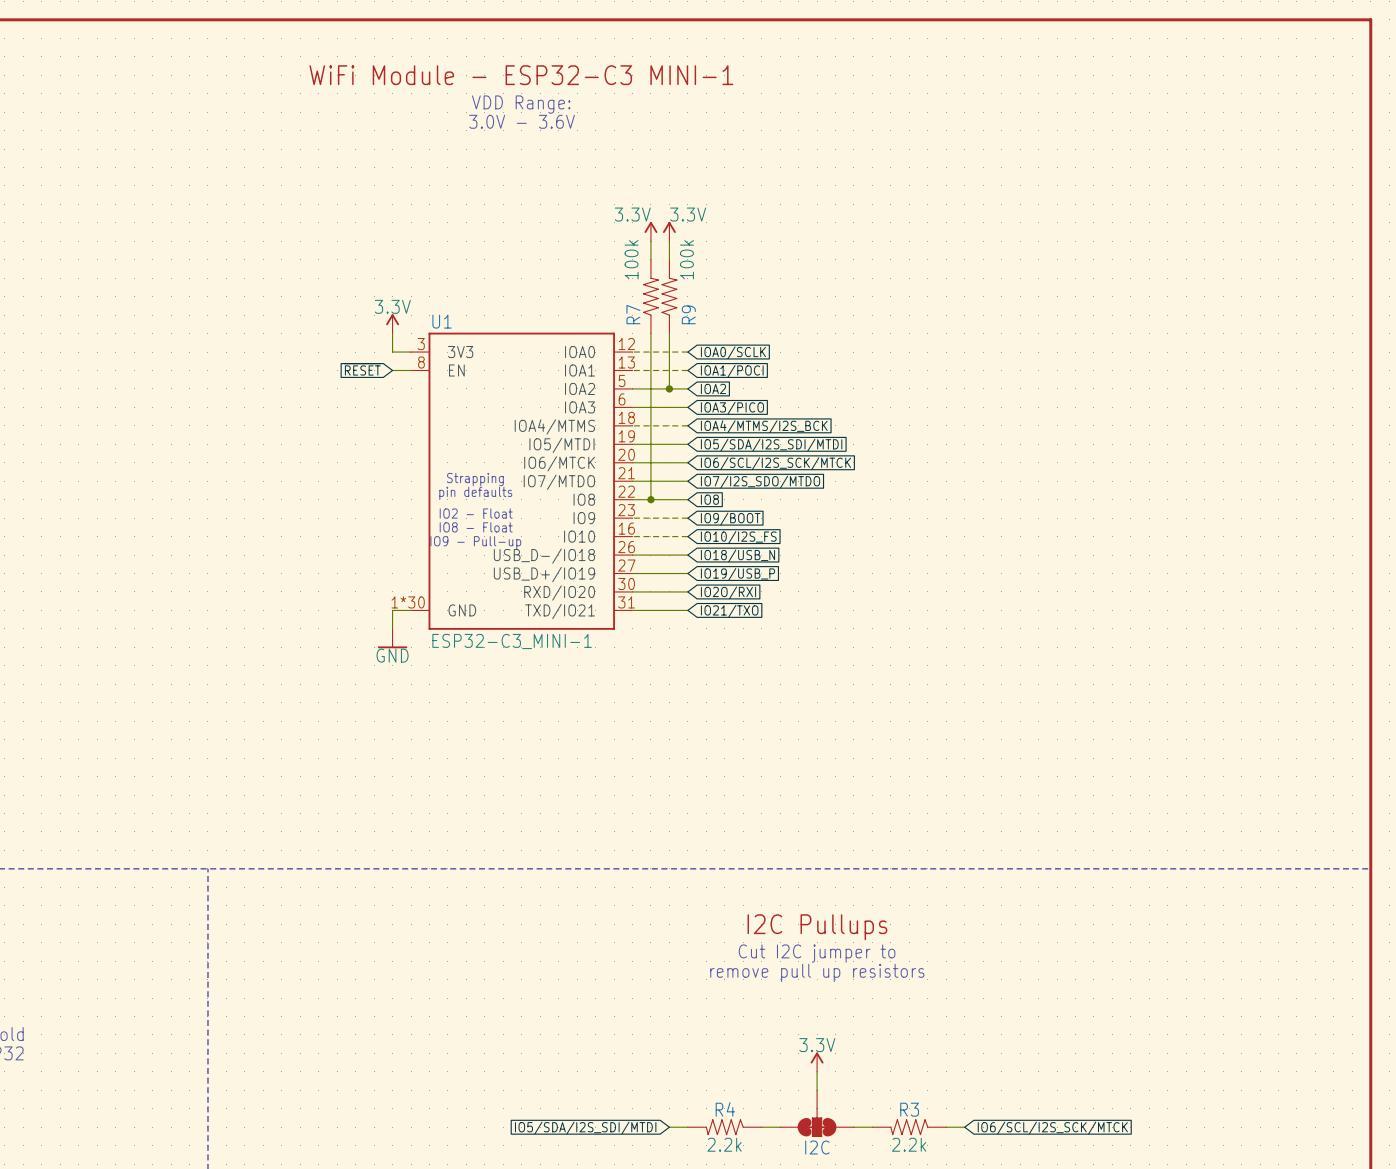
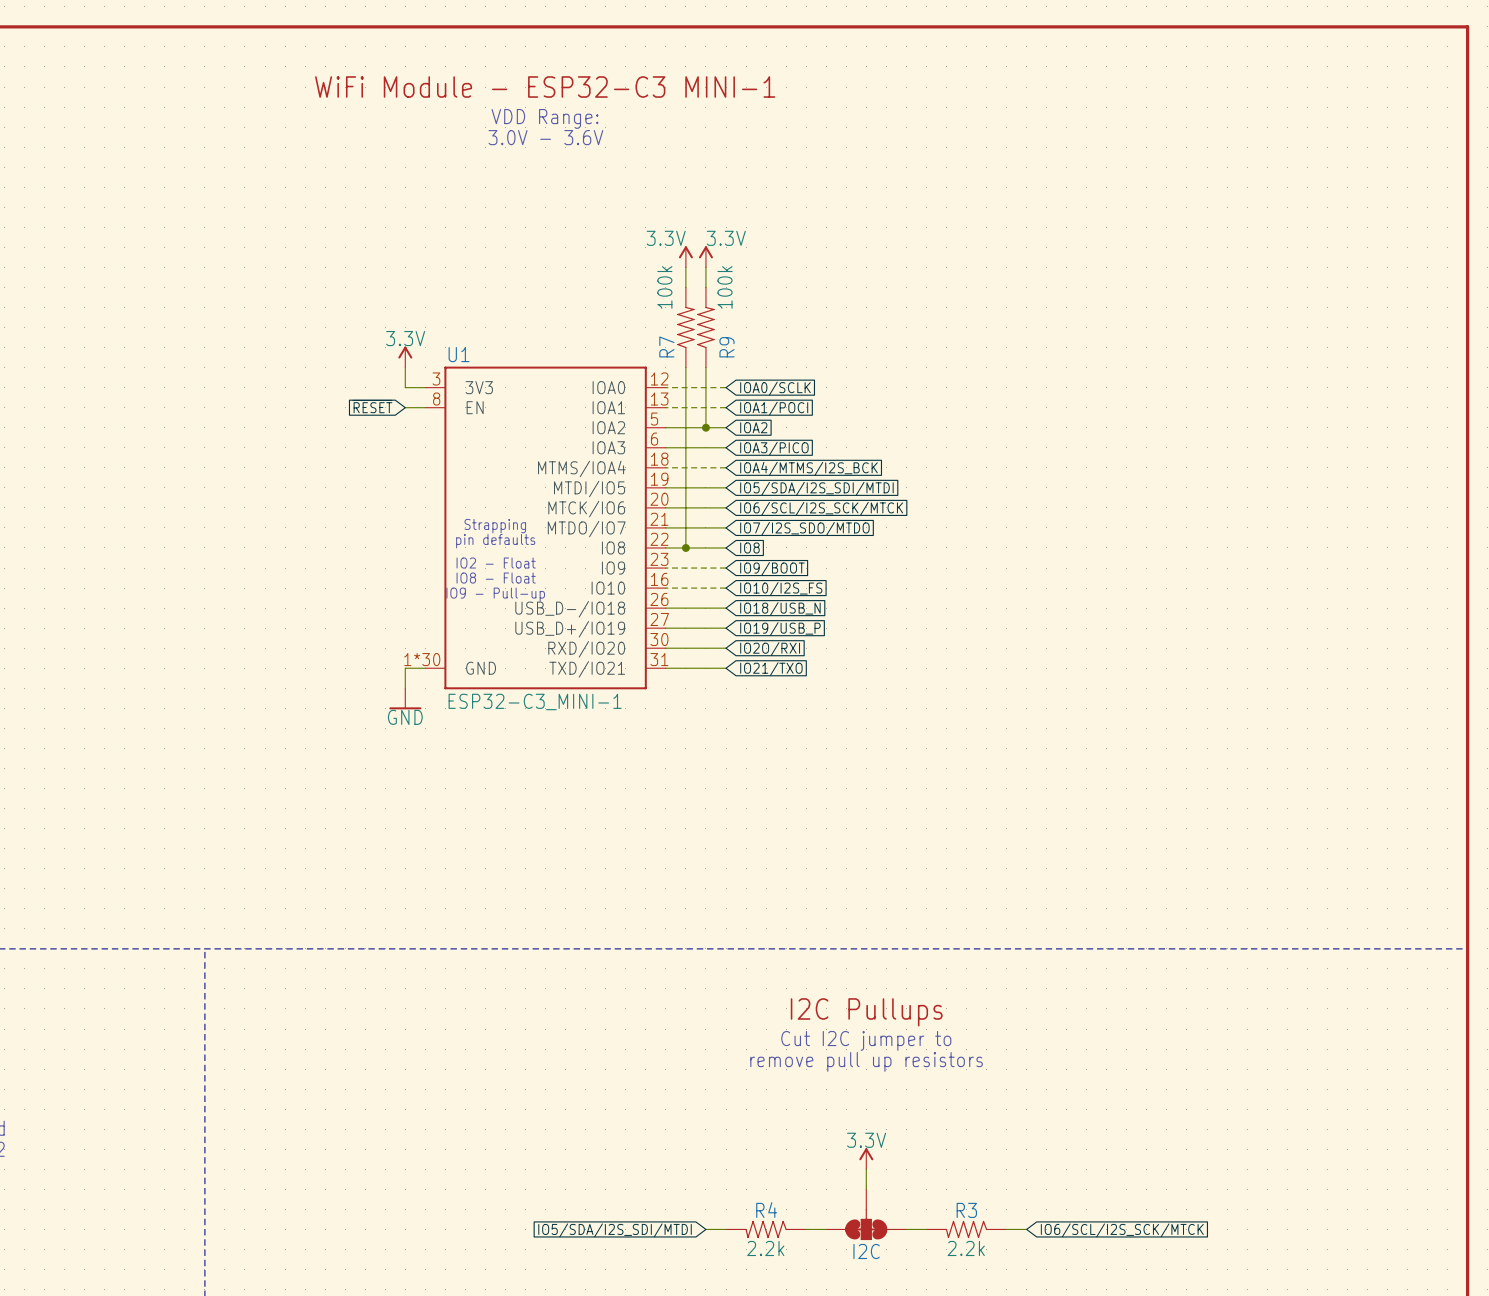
U1 pin name: IOA4/MTMS (554, 426) -> MTMS/IOA4 (581, 468)
U1 pin name: IO5/MTDI (561, 445) -> MTDI/IO5 (589, 489)
U1 pin name: IO6/MTCK (559, 463) -> MTCK/IO6 (586, 509)
U1 pin name: IO7/MTDO (559, 482) -> MTDO/IO7 (586, 529)

